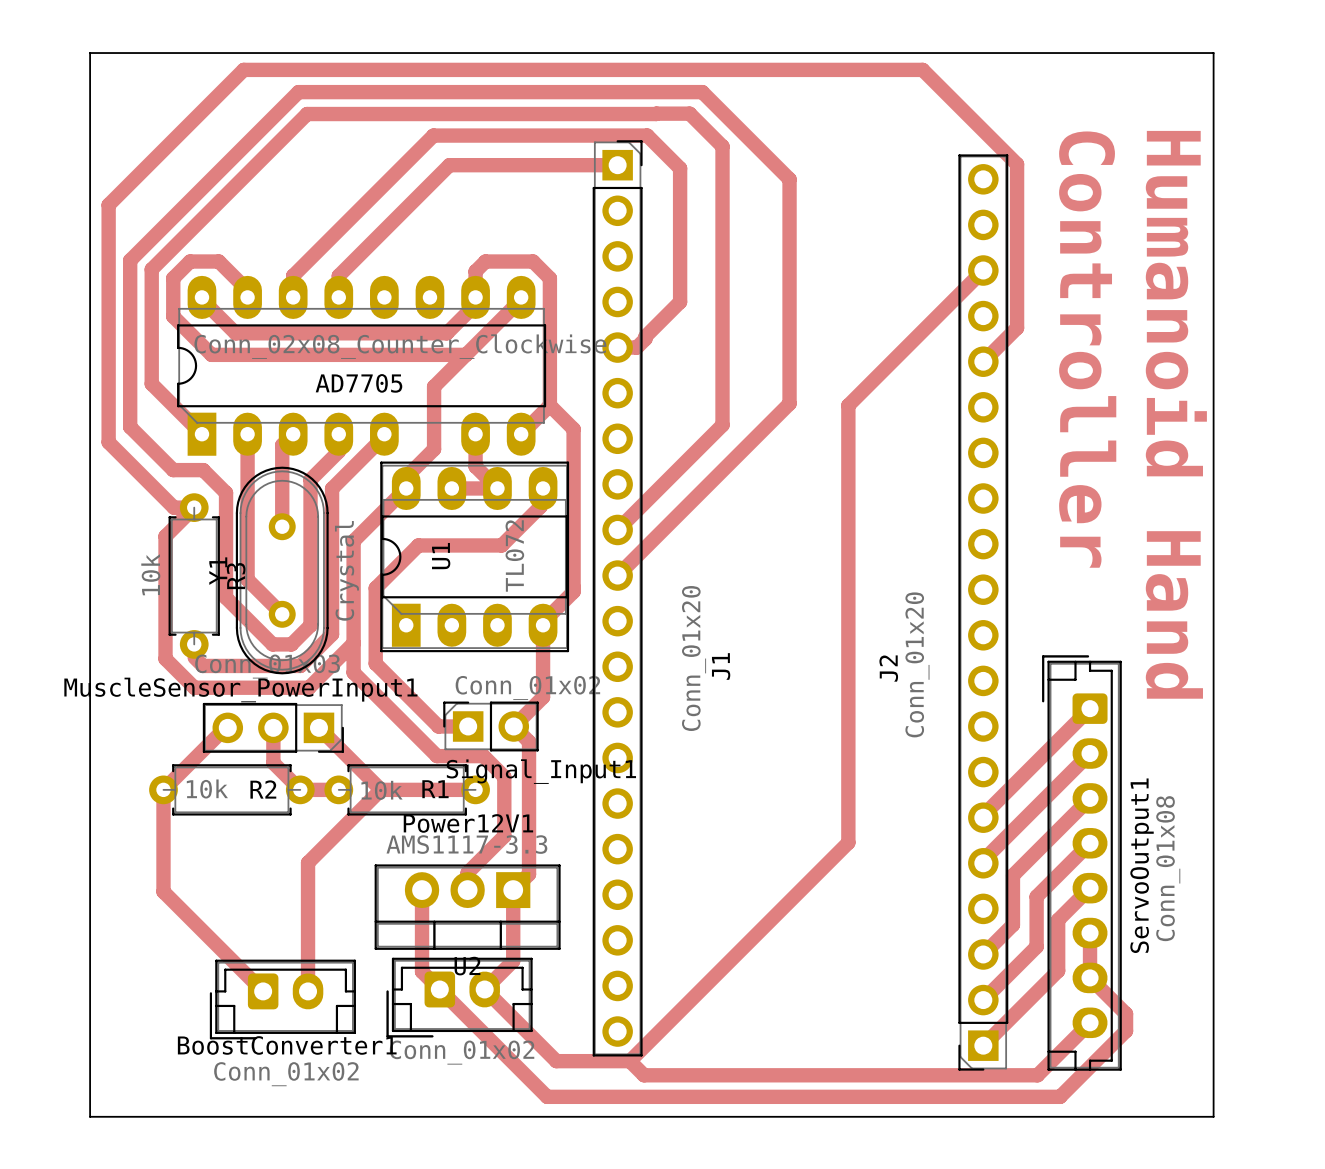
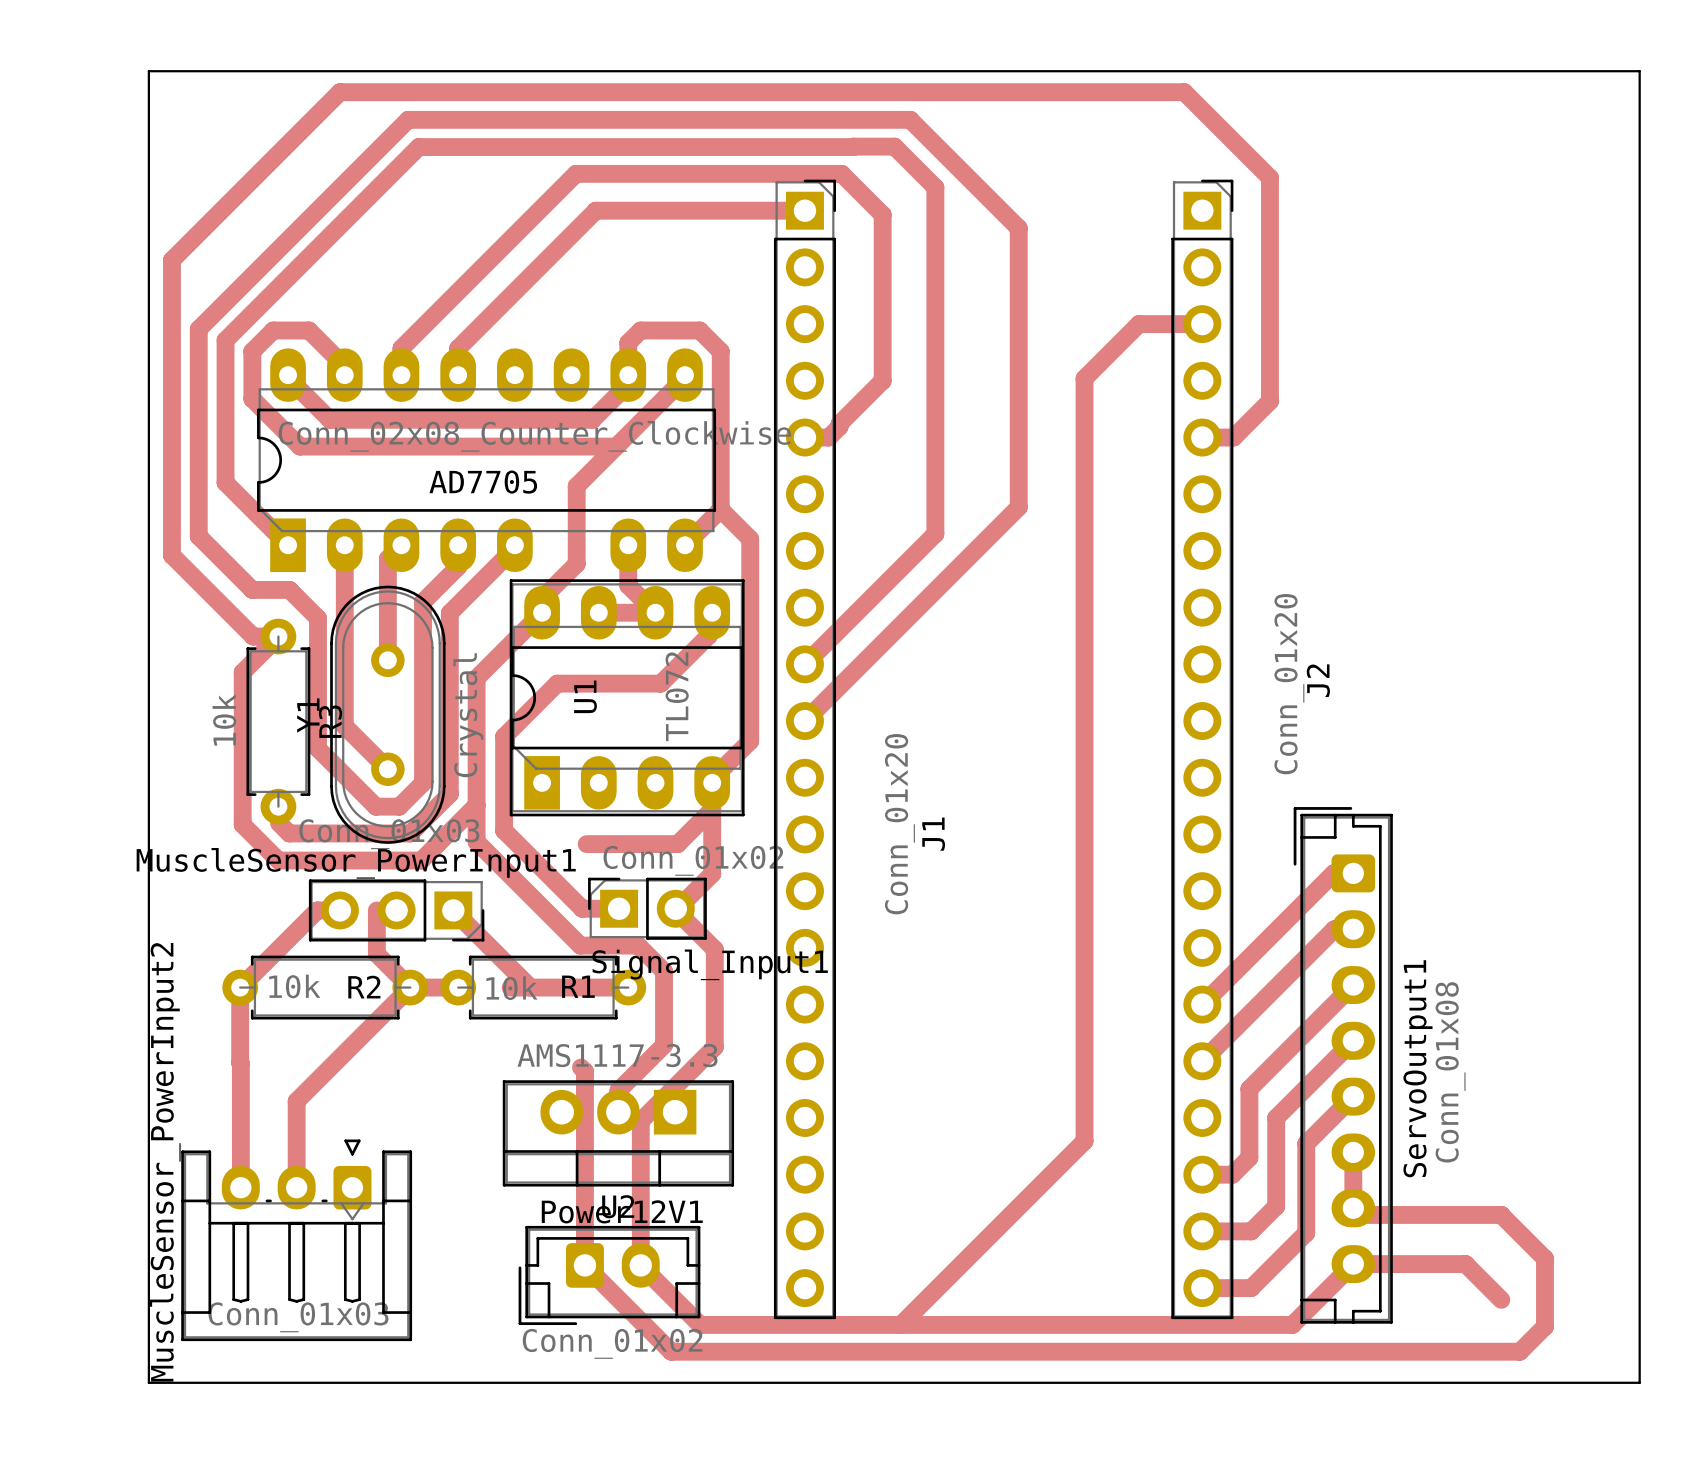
board edge: (1213, 53) (1213, 1116) (90, 1116) (90, 1107) -> (1546, 71) (1639, 71) (1639, 1382) (148, 1382)
track: (991, 138) (1017, 164) (1017, 327) (983, 361) -> (1269, 177) (1269, 401) (1233, 437) (1202, 437)
track: none -> (1202, 324) (1138, 324) (1084, 378) (1084, 1141) (900, 1324)
track: (983, 270) (848, 405) (848, 842) (629, 1061) (644, 1075) (1037, 1075) (1090, 1022) -> none
text: Controller (1087, 349) -> none
text: Humanoid Hand (1176, 414) -> none
J2 rotation: 0° (983, 612) -> 180° (1202, 749)
track: none -> (712, 809) (677, 844) (586, 844)
track: (543, 697) (513, 726) (529, 741) (529, 874) (513, 890) (513, 960) (484, 989) (556, 1061) -> (712, 872) (675, 910) (714, 949) (714, 1047) (640, 1121) (640, 1265) (700, 1324) (728, 1324)
track: none -> (1353, 873) (1333, 873) (1202, 1004)
track: (1090, 708) (983, 815) (983, 817) -> none
MuscleSensor_PowerInput1 position: (273, 727) -> (396, 910)
track: (318, 727) (380, 789) (308, 862) (308, 991) -> none
track: none -> (453, 910) (530, 987)
track: none -> (1353, 929) (1334, 929) (1202, 1061)
track: (1090, 753) (983, 860) (983, 863) -> none
track: none -> (1353, 985) (1249, 1088) (1249, 1157) (1232, 1174) (1202, 1174)
track: none -> (410, 987) (296, 1101) (296, 1187)
track: (1090, 798) (1012, 875) (1012, 924) (983, 954) -> none
Power12V1 name position: Power12V1 (468, 823) -> Power12V1 (622, 1211)
track: none -> (1353, 1040) (1276, 1117) (1276, 1206) (1251, 1231) (1202, 1231)
track: (1090, 843) (1036, 896) (1036, 946) (983, 1000) -> none
track: (163, 850) (163, 891) (263, 991) -> (240, 1062) (240, 1187)
track: none -> (580, 1067) (584, 1071) (584, 1265) (671, 1351) (1519, 1351) (1544, 1326) (1544, 1258) (1501, 1214) (1360, 1214) (1353, 1208) (1353, 1152)
ServoOutput1 position: (1081, 863) -> (1343, 1065)
track: none -> (1353, 1096) (1306, 1143) (1306, 1233) (1251, 1288) (1202, 1288)
track: (1090, 888) (1058, 920) (1058, 970) (983, 1045) -> none
track: (422, 890) (422, 971) (547, 1096) (1060, 1096) (1126, 1030) (1126, 1013) (1090, 977) (1090, 933) -> none
MuscleSensor_PowerInput2: none -> Conn_01x03 (296, 1240)
Power12V1 position: (459, 997) -> (609, 1275)
BoostConverter1: Conn_01x02 (282, 999) -> none
track: none -> (1501, 1299) (1465, 1264) (1353, 1264) (1292, 1324) (820, 1324)

